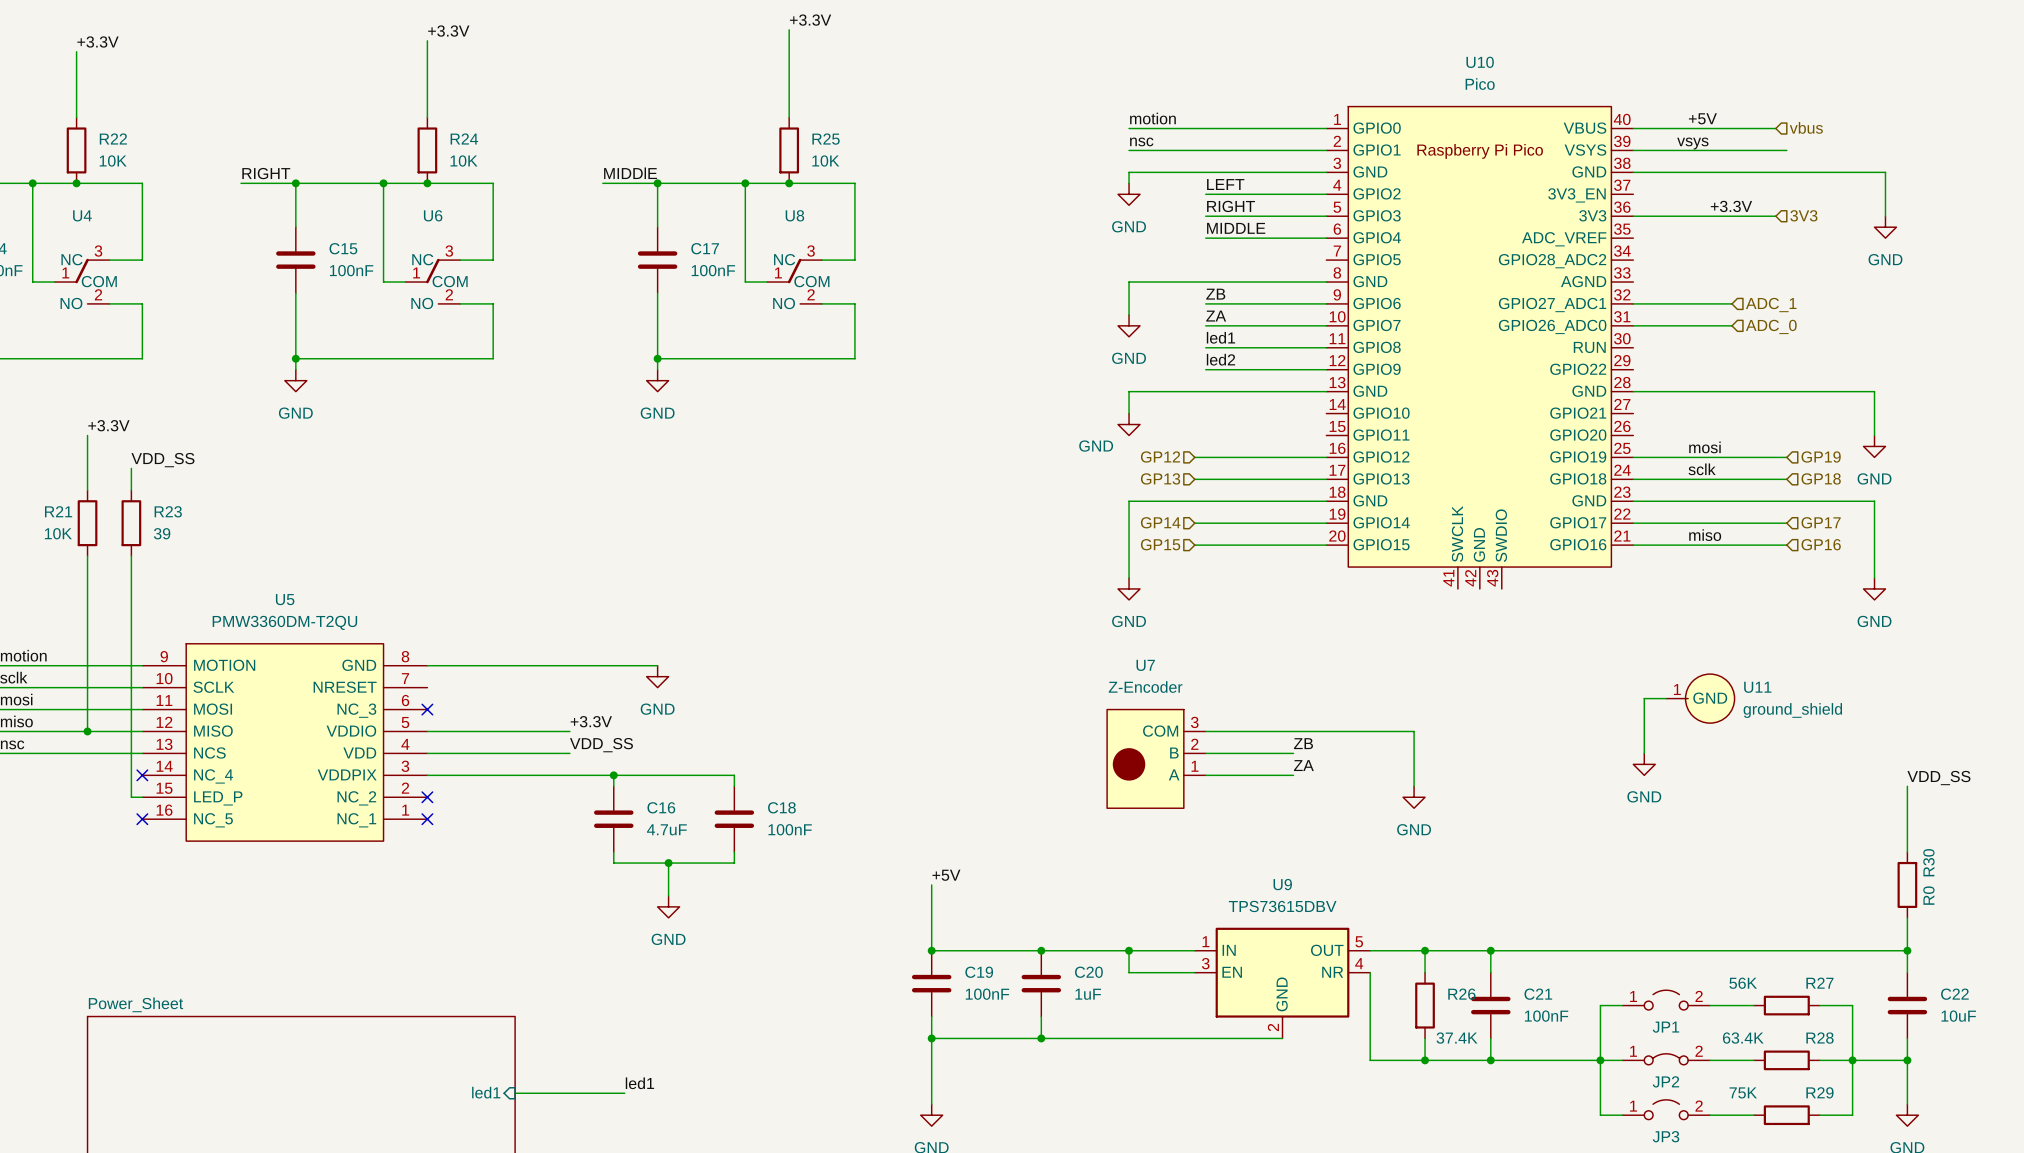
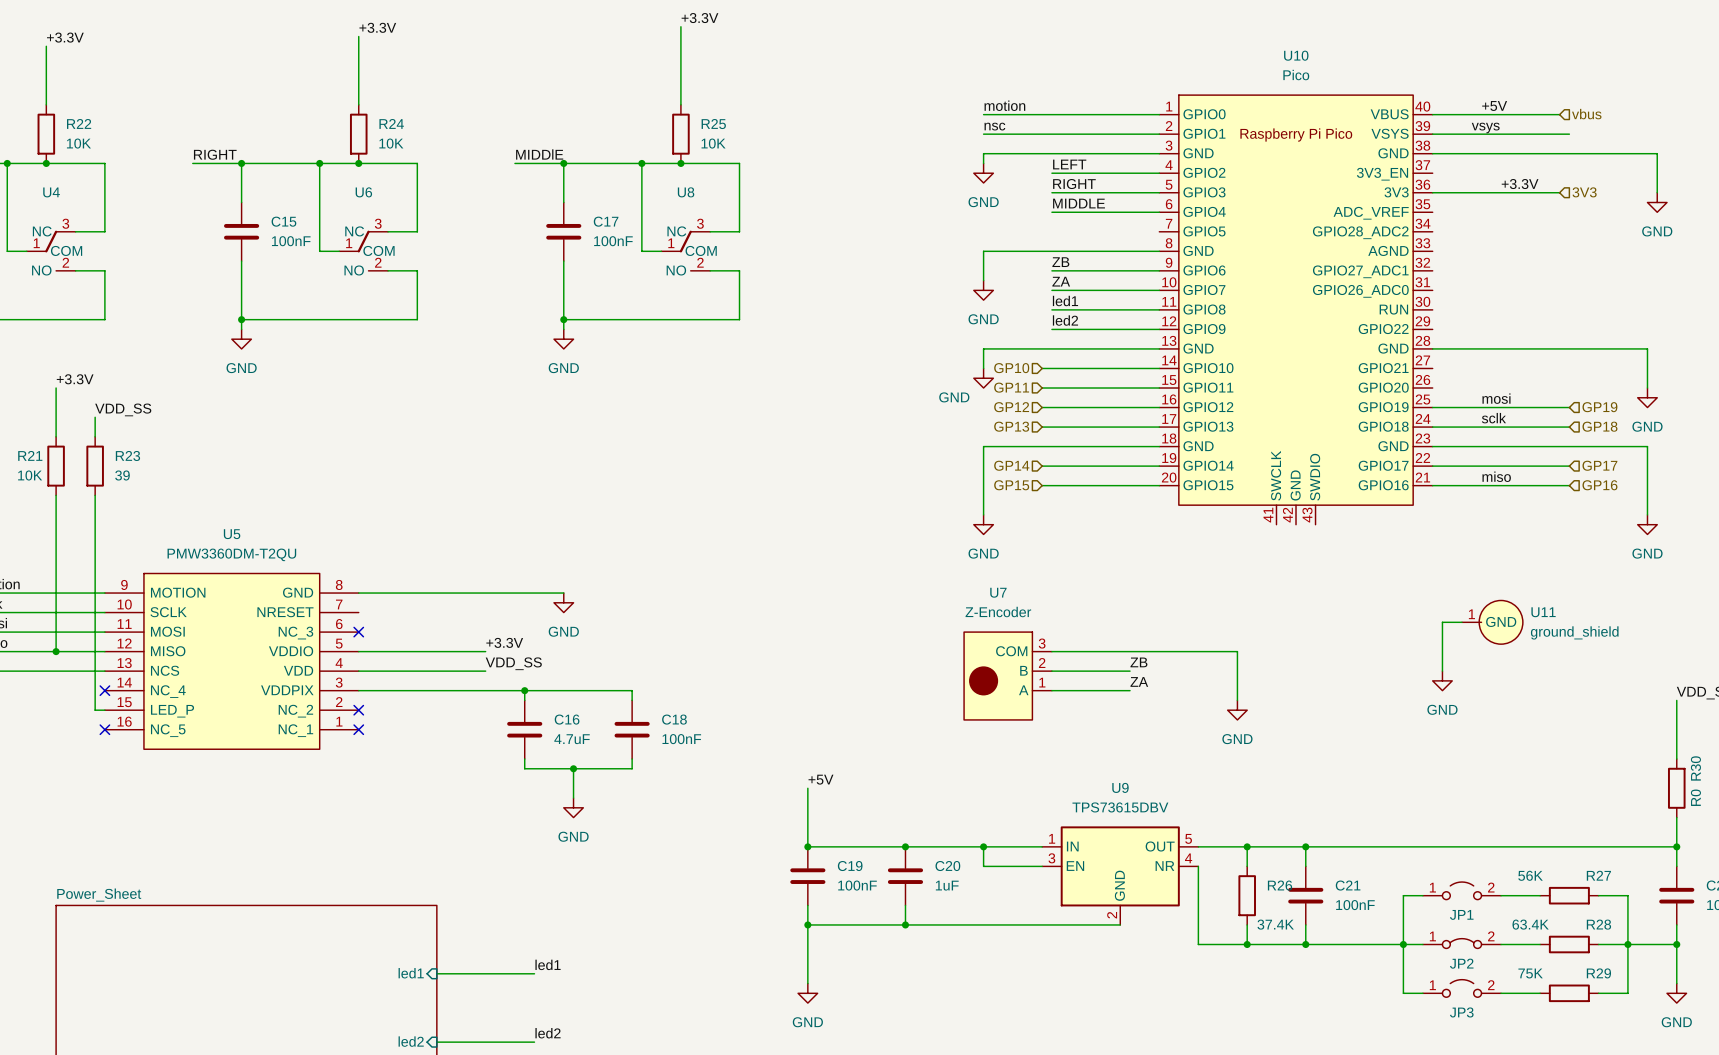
wire: (1633, 303) (1731, 303) -> none
hierarchical label: ADC_1 (1771, 305) -> none
wire: (1633, 325) (1731, 325) -> none
hierarchical label: ADC_0 (1771, 326) -> none
hierarchical label: none -> GP10 (1011, 368)
wire: none -> (1042, 368) (1159, 368)
hierarchical label: none -> GP11 (1011, 387)
wire: none -> (1042, 388) (1159, 388)

